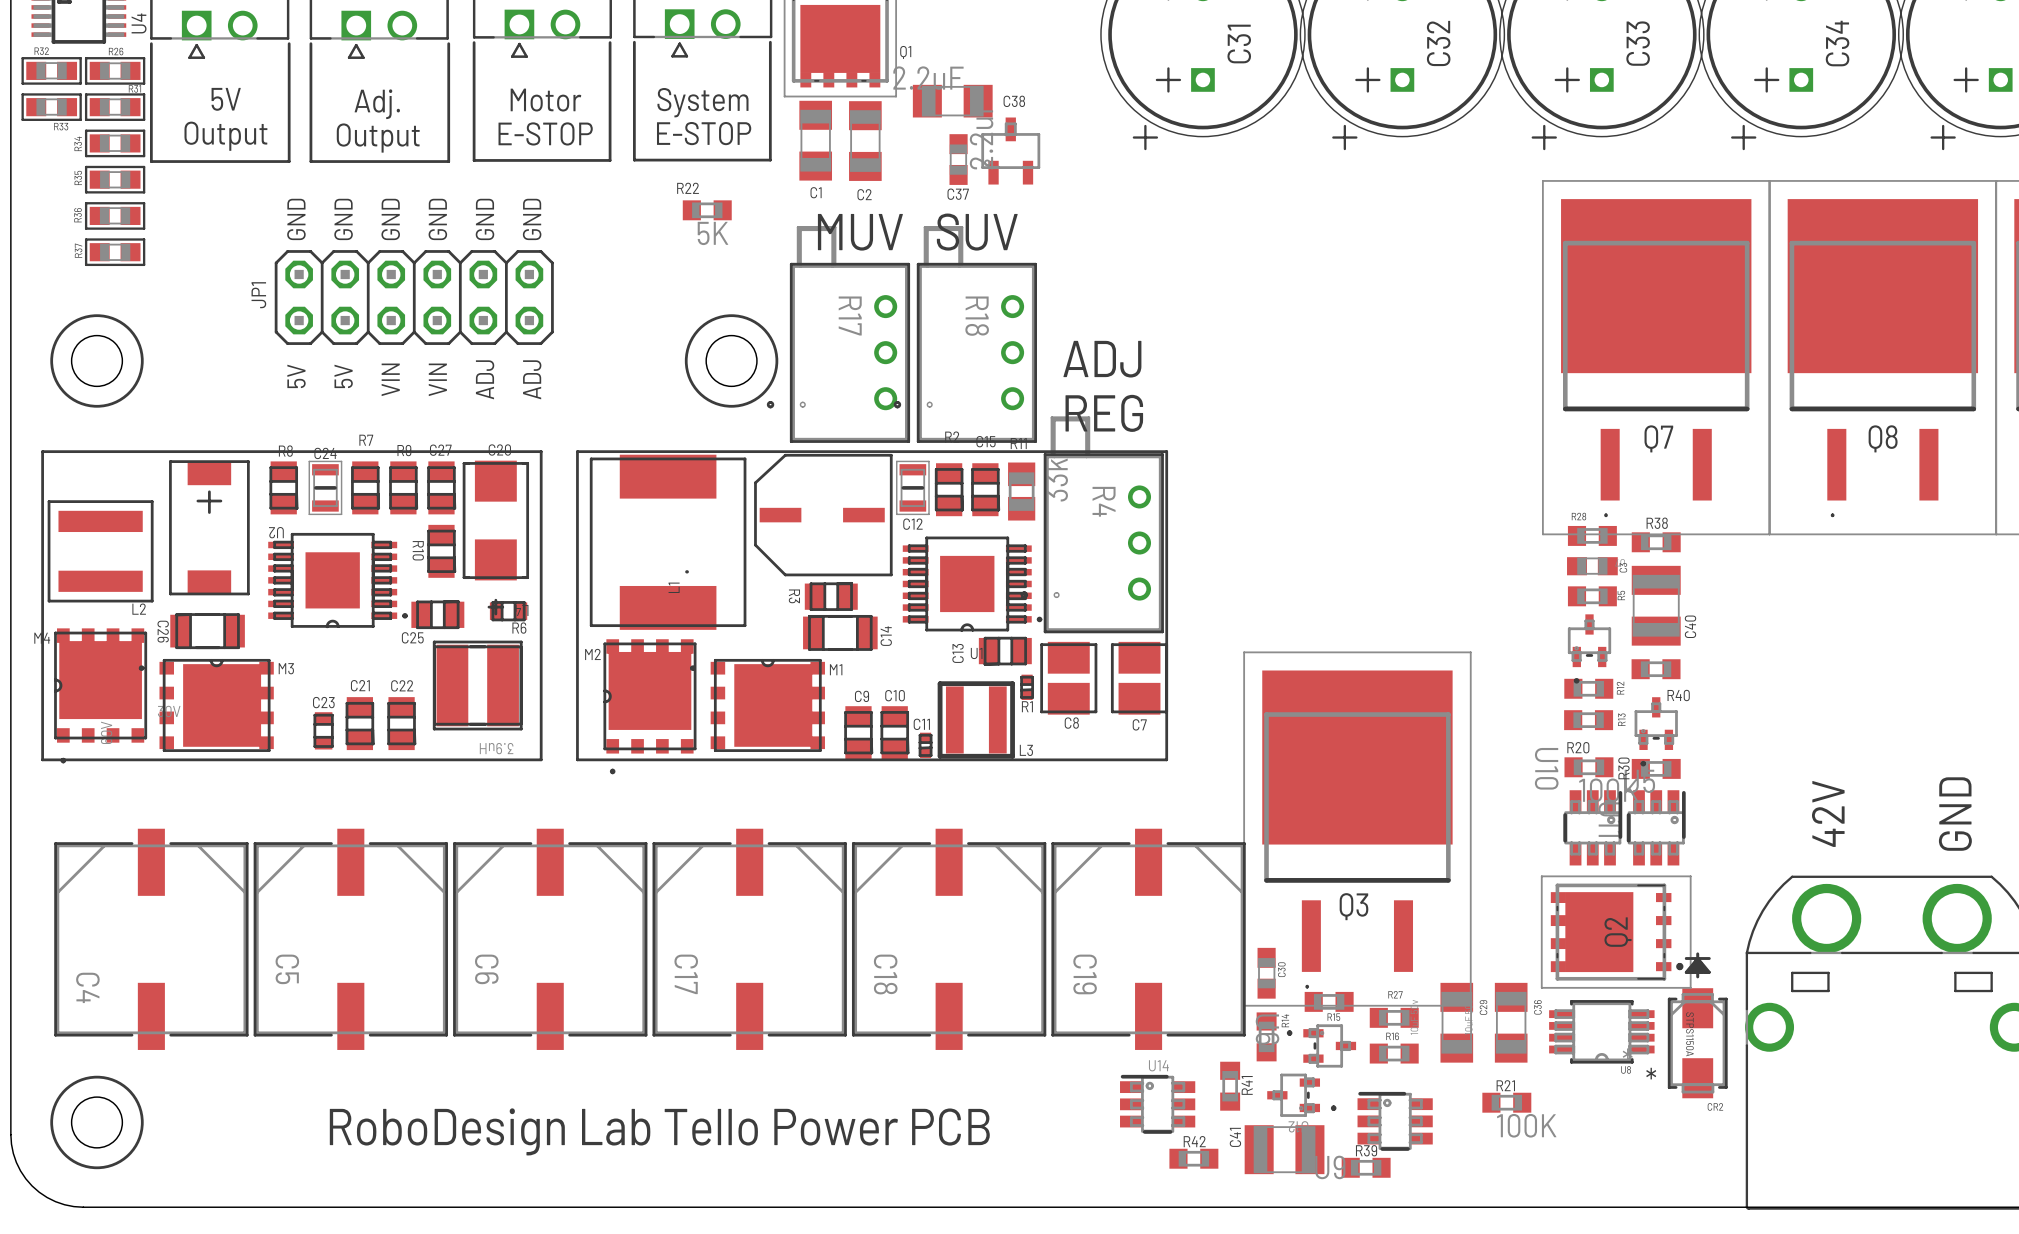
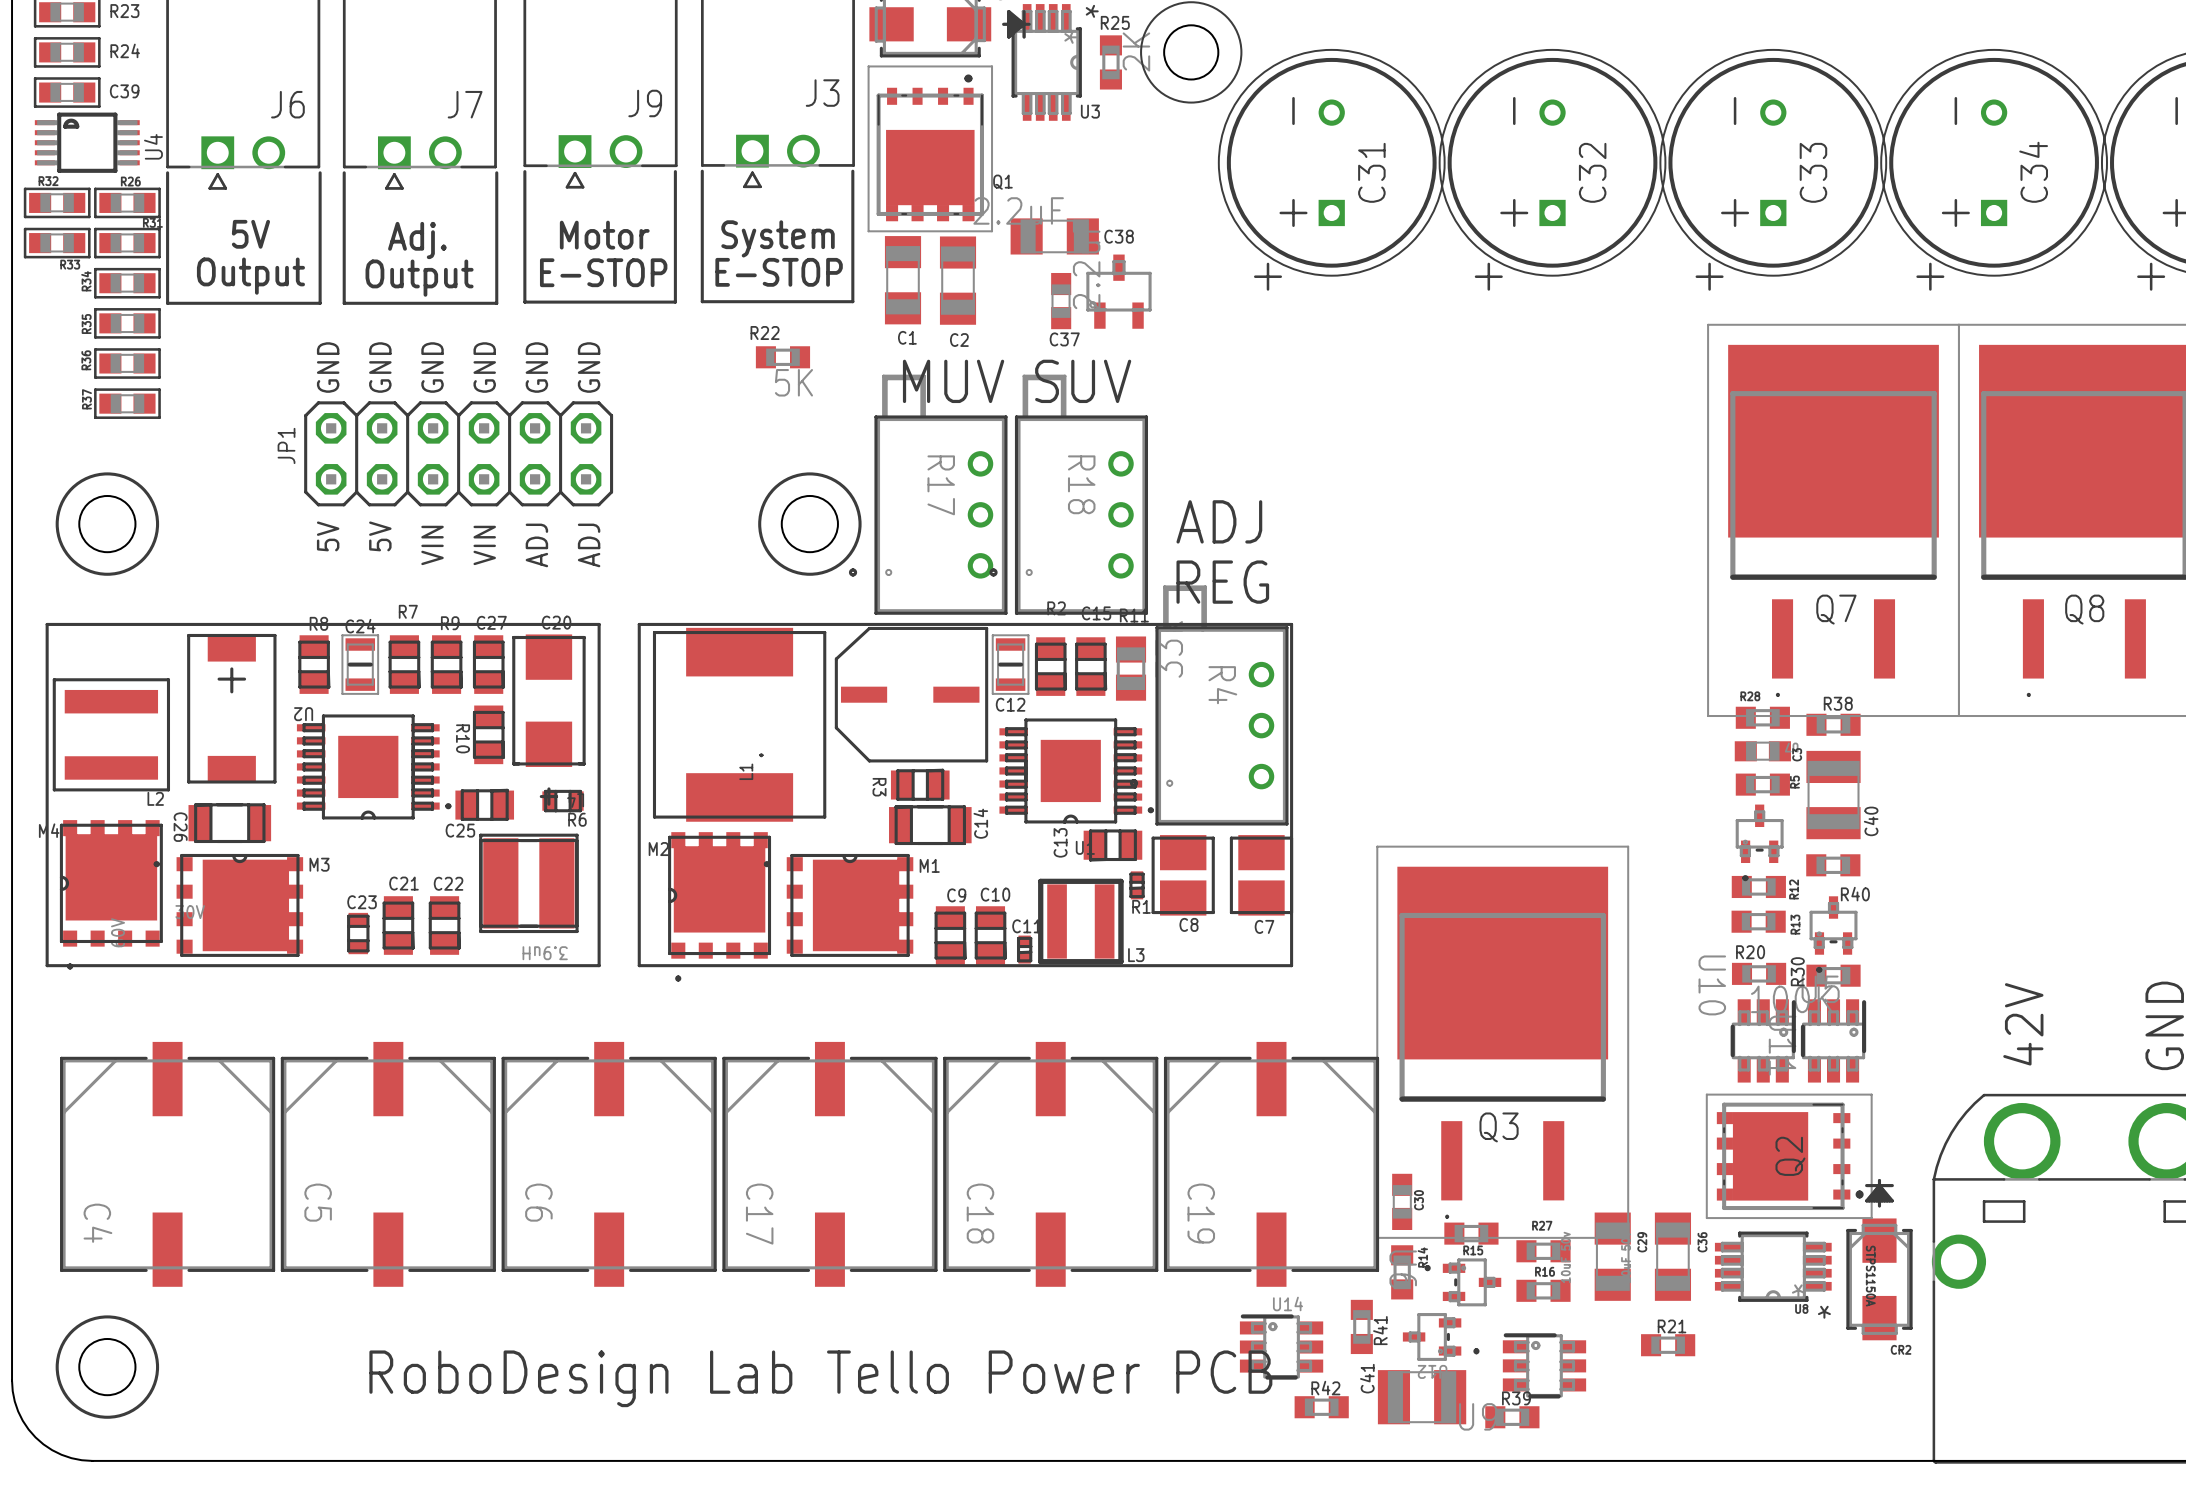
R21 value: 100K (1526, 1125) -> none

